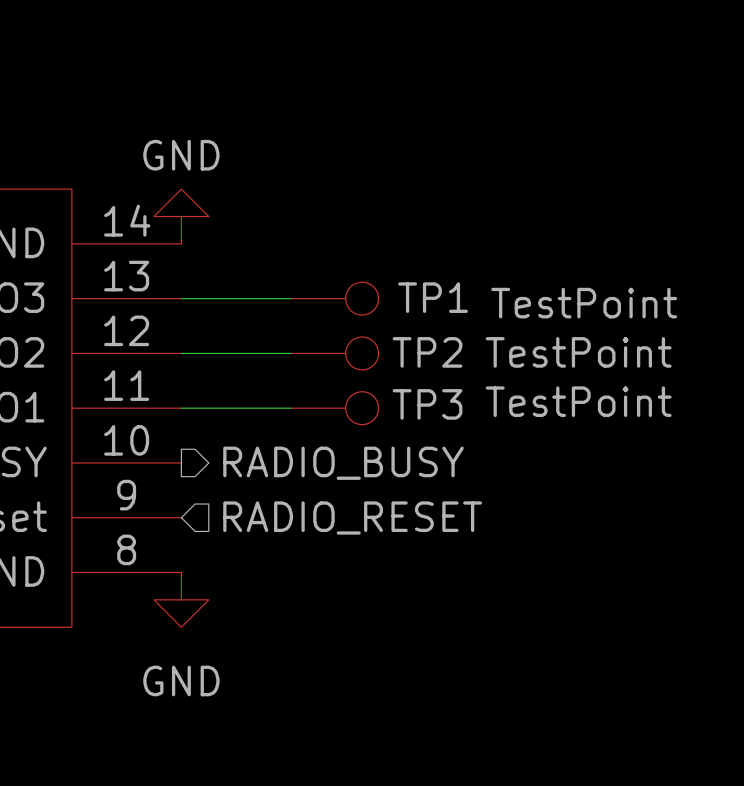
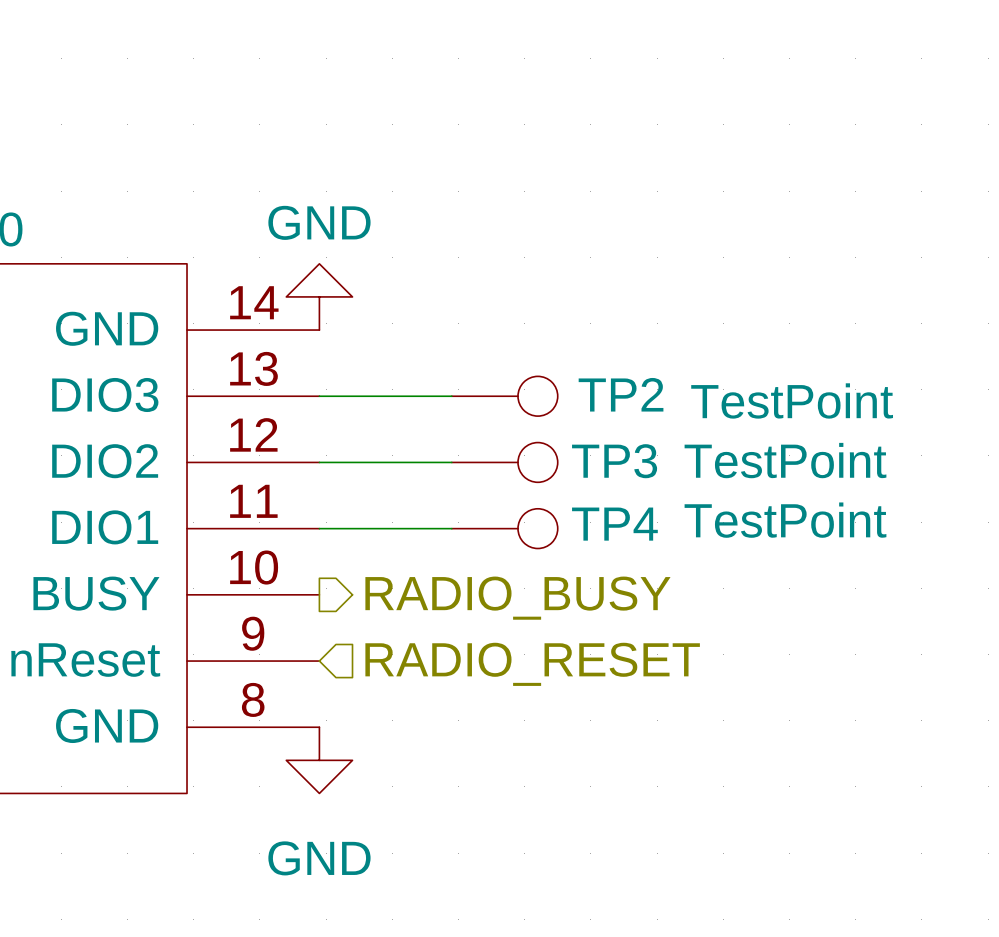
TP1 name: TP1 (433, 297) -> TP2 (621, 394)
TP2 name: TP2 (427, 352) -> TP3 (614, 461)
TP3 name: TP3 (427, 404) -> TP4 (614, 524)

